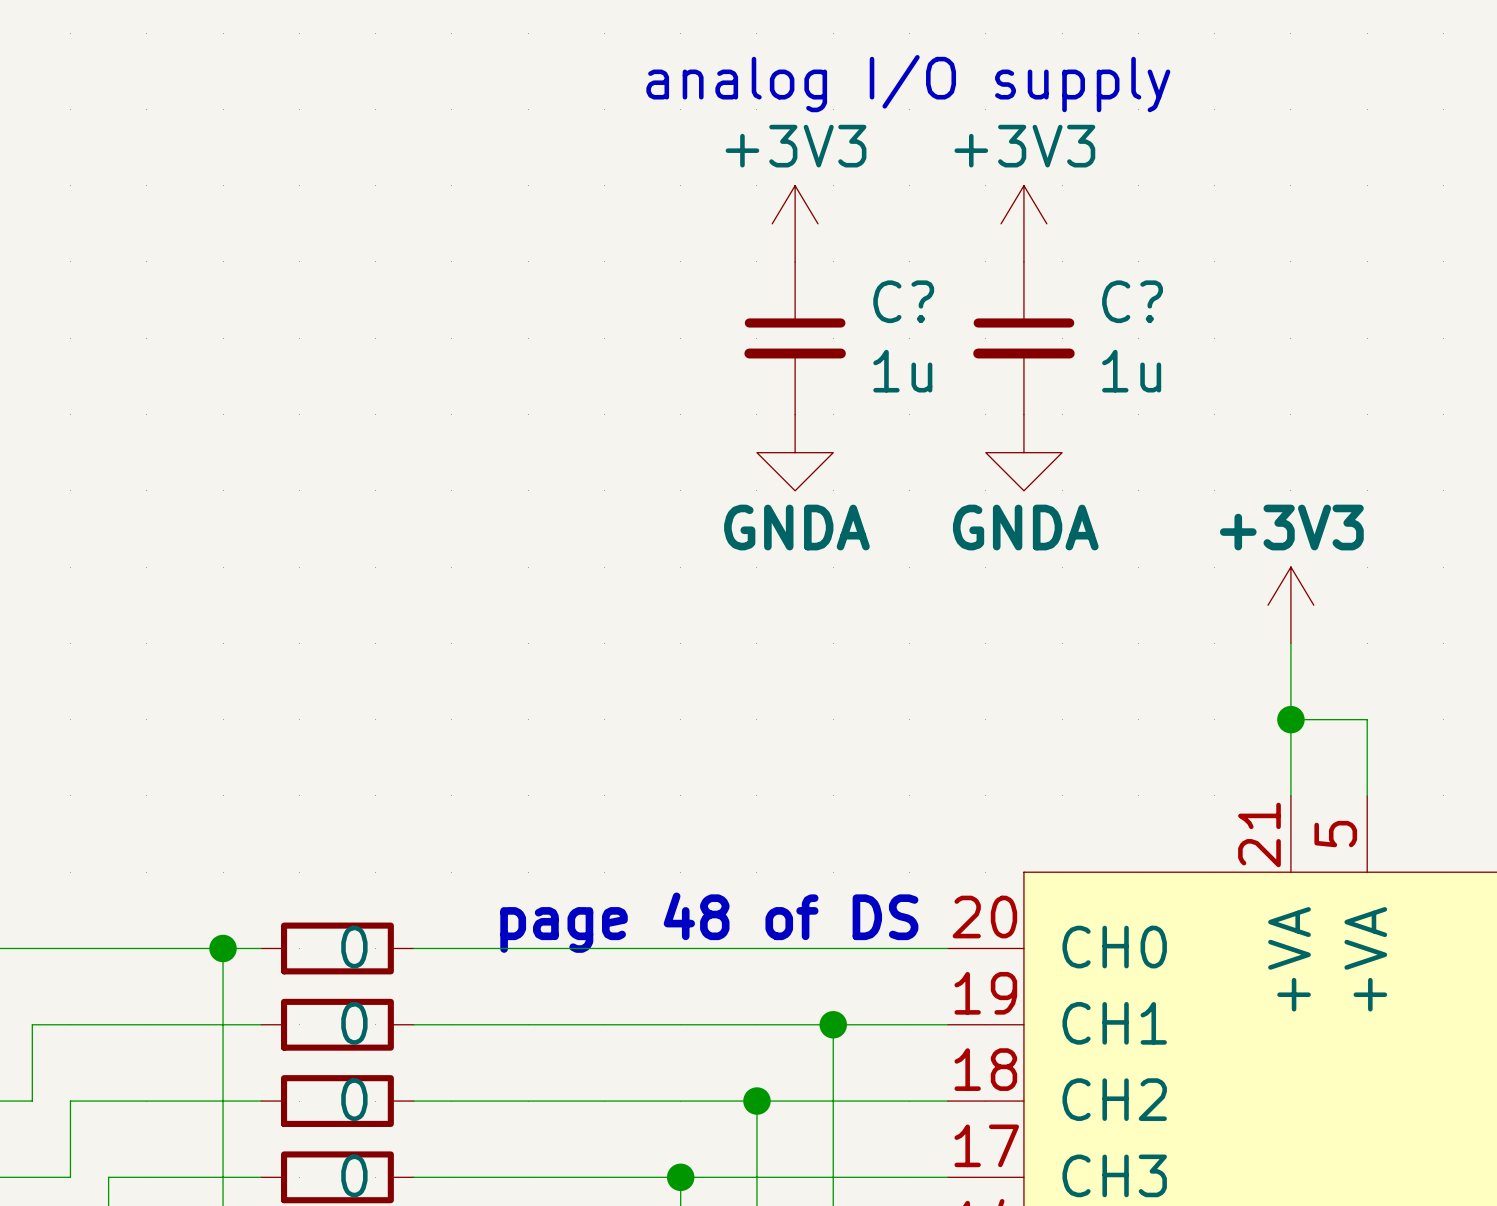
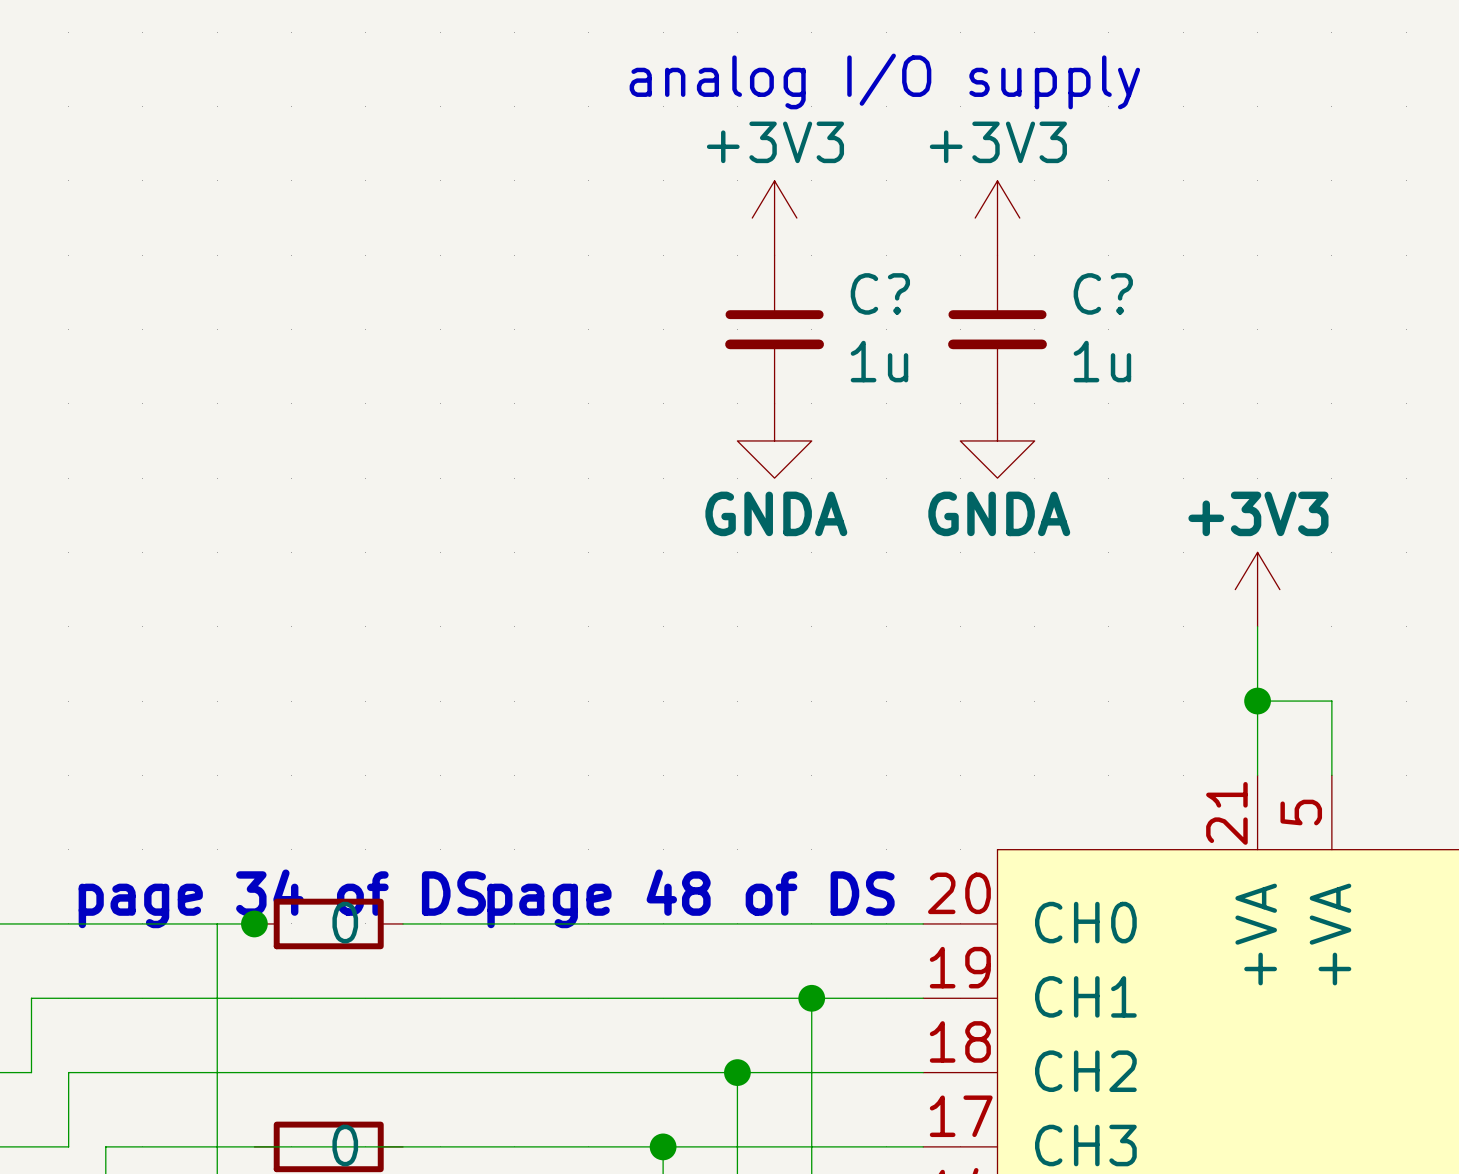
text: none -> page 34 of DS (282, 898)
junction position: (223, 948) -> (254, 923)
wire: none -> (254, 998) (403, 998)
part: 0 (337, 1024) -> none
wire: none -> (254, 1072) (403, 1072)
part: 0 (337, 1101) -> none
wire: none -> (254, 1146) (403, 1146)

